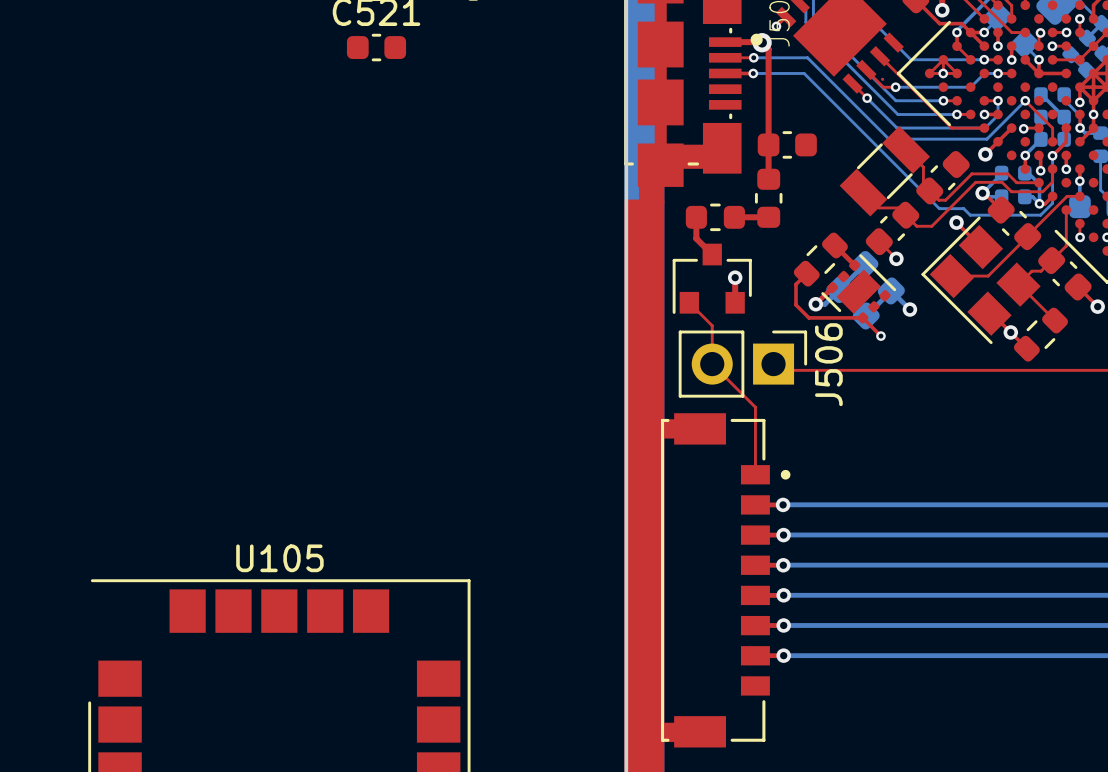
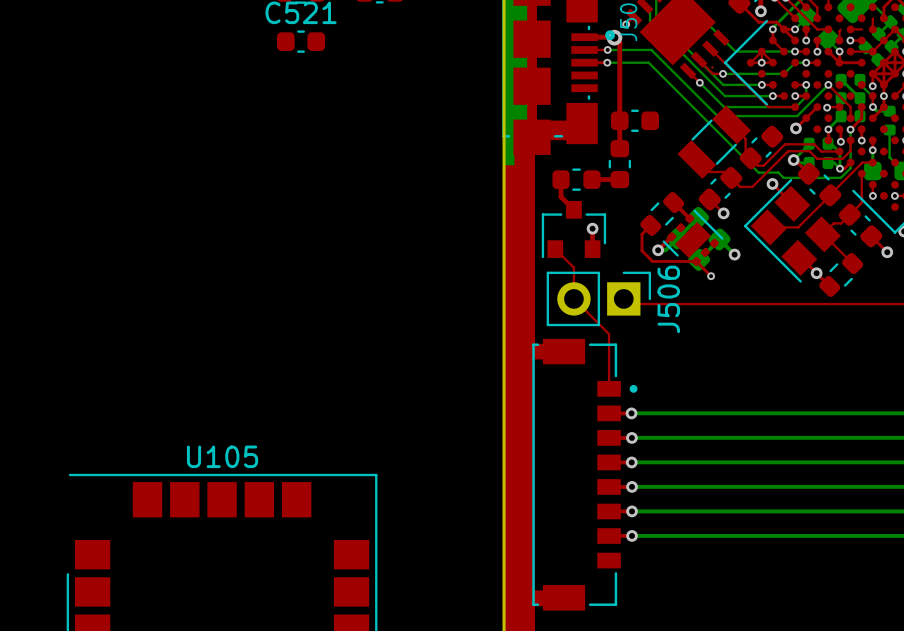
via: (1079, 18) -> none
via: (1040, 32) -> none
via: (1066, 32) -> none

